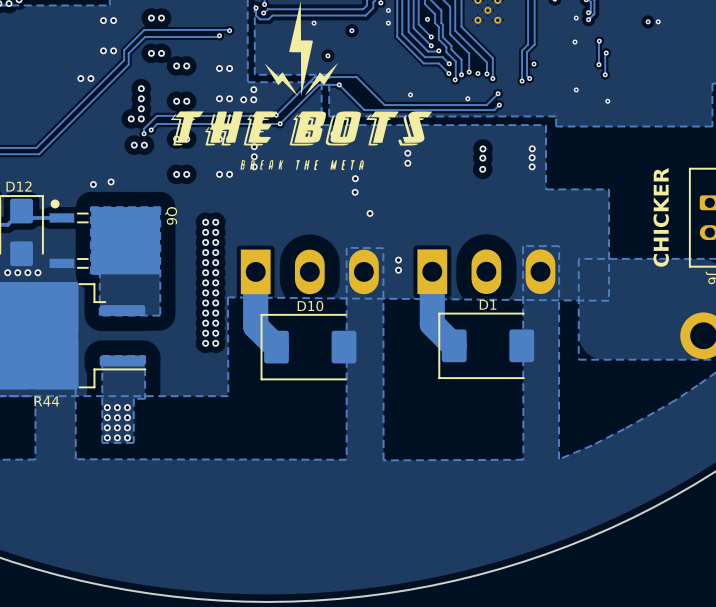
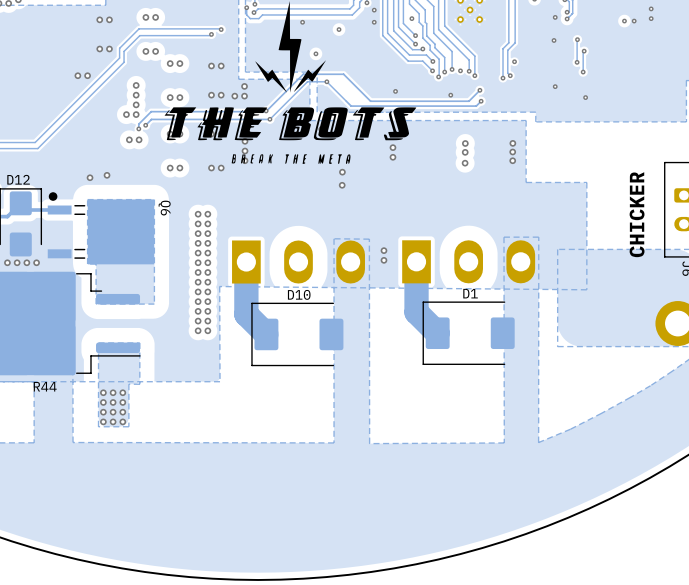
via: none -> (651, 8)
via: none -> (651, 18)
via: (370, 213) -> none

